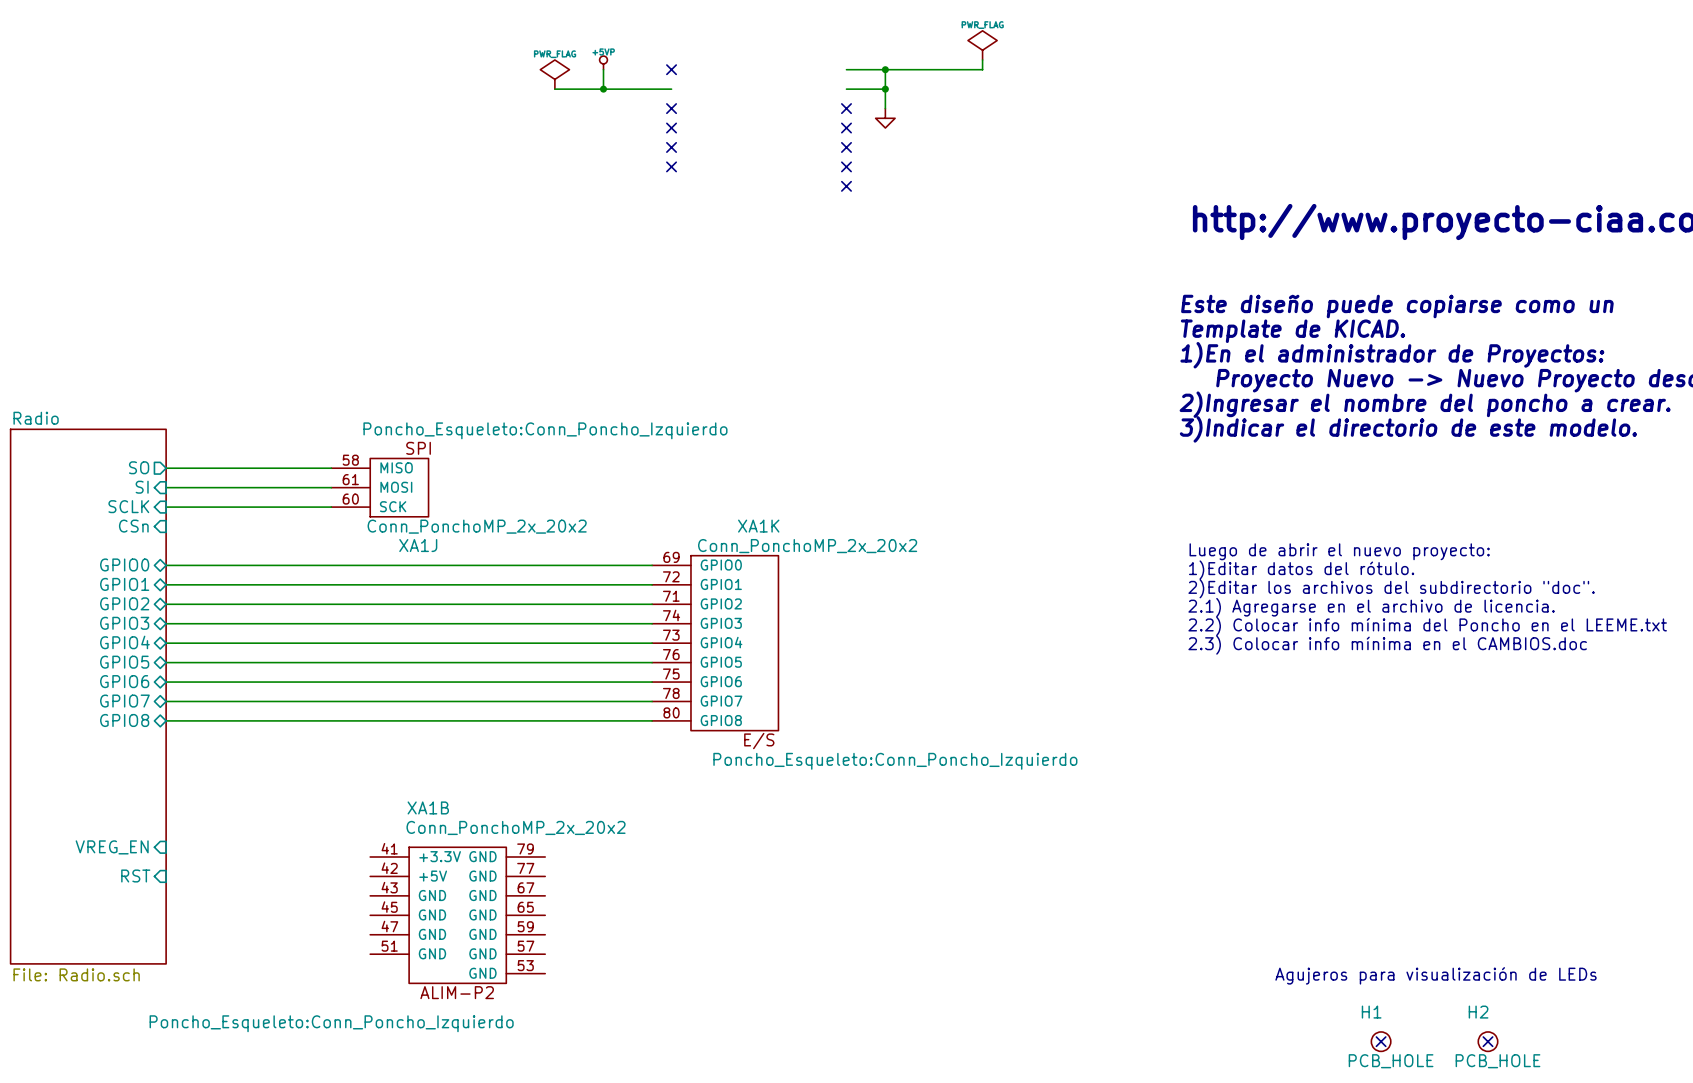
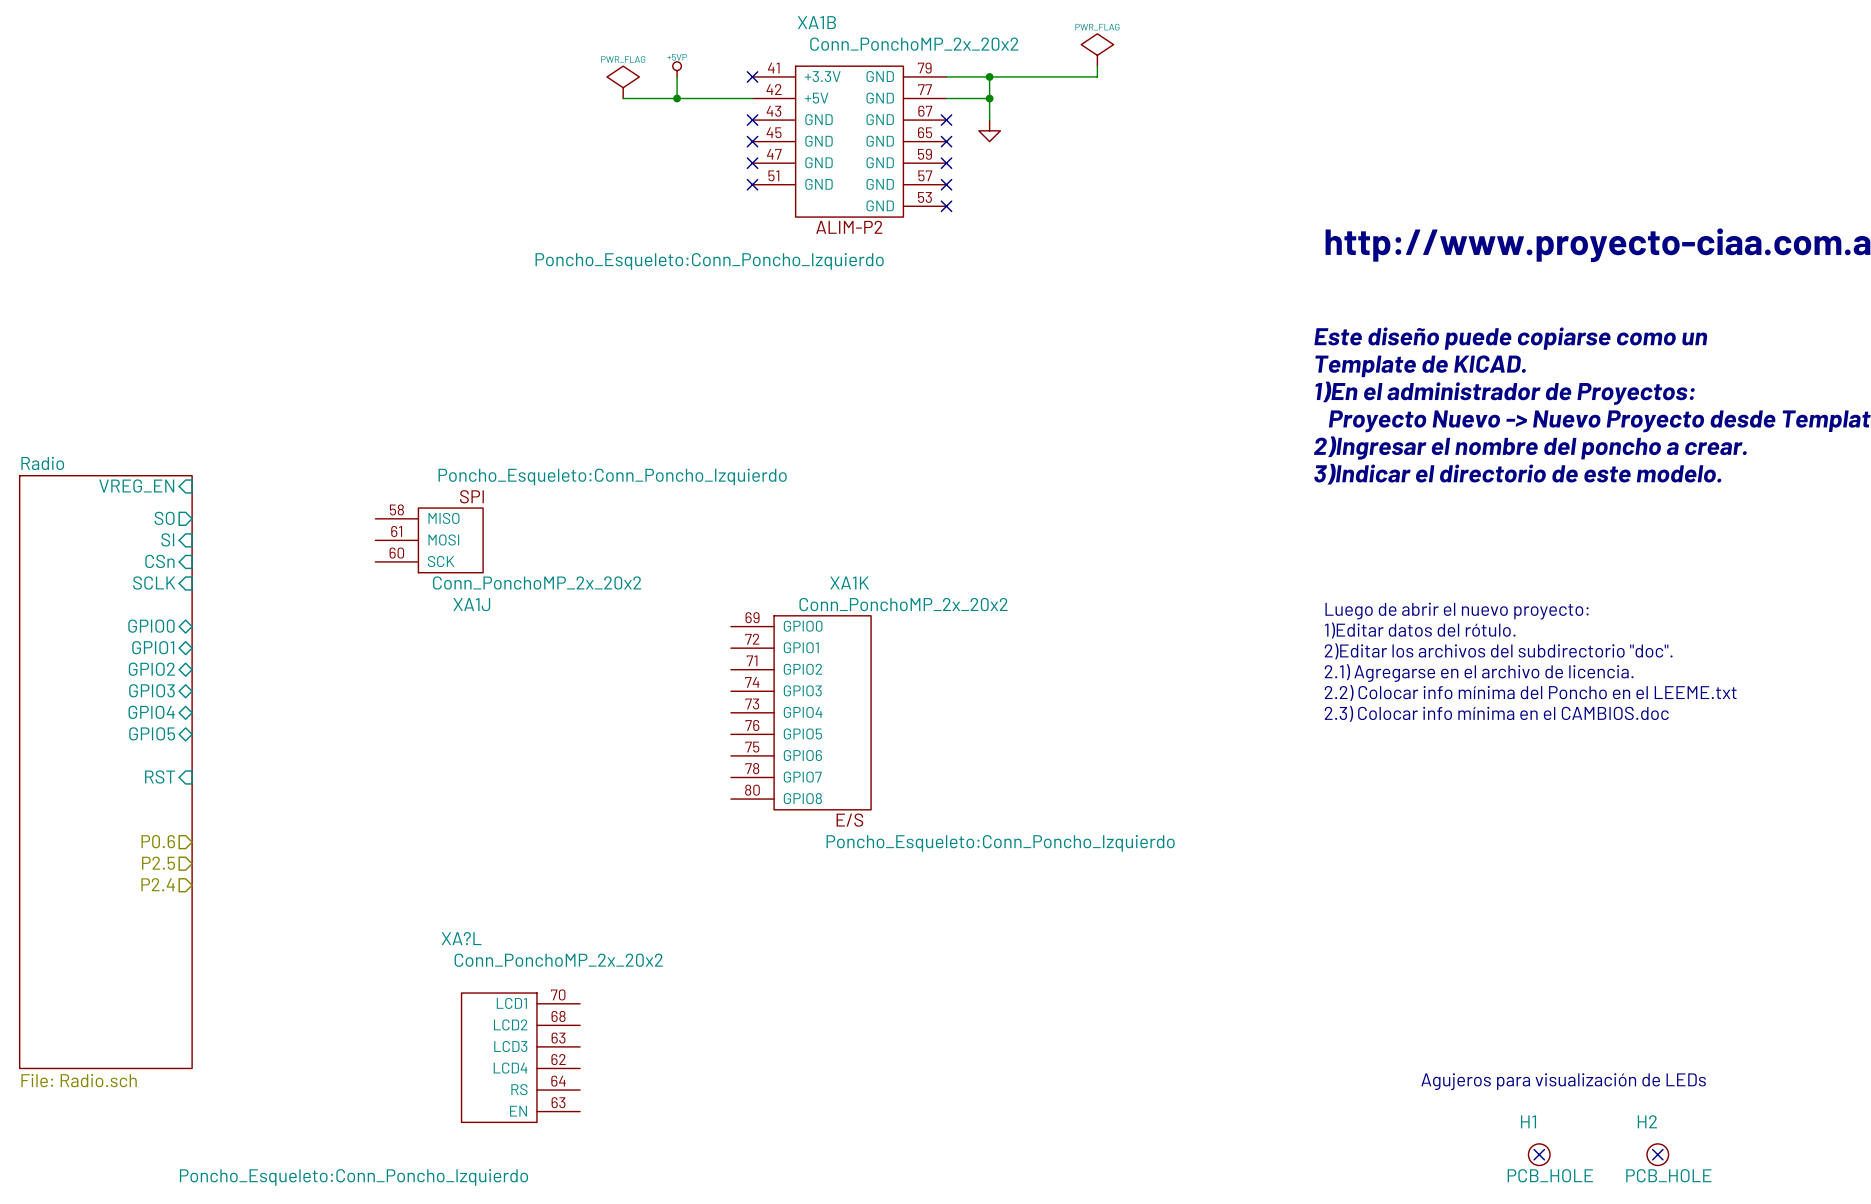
sheet pin: none -> VREG_EN (136, 486)
wire: (166, 468) (331, 468) -> none
wire: (166, 487) (331, 487) -> none
sheet pin: SCLK (128, 506) -> CSn (159, 561)
wire: (166, 507) (331, 507) -> none
sheet pin: CSn (133, 526) -> SCLK (154, 583)
wire: (166, 565) (652, 565) -> none
wire: (166, 584) (652, 584) -> none
wire: (166, 604) (652, 604) -> none
wire: (166, 623) (652, 623) -> none
wire: (166, 643) (652, 643) -> none
wire: (166, 662) (652, 662) -> none
sheet pin: GPIO6 (124, 681) -> none
wire: (166, 682) (652, 682) -> none
sheet pin shape: bidirectional (124, 701) -> input (160, 776)
sheet pin: GPIO7 (124, 701) -> RST (160, 776)
wire: (166, 701) (652, 701) -> none
sheet pin: GPIO8 (124, 720) -> none
wire: (166, 720) (652, 720) -> none
hierarchical label: none -> P0.6 (158, 841)
hierarchical label: none -> P2.5 (158, 863)
hierarchical label: none -> P2.4 (158, 884)
sheet pin: VREG_EN (112, 847) -> none
sheet pin: RST (135, 876) -> none
XA1B position: (457, 915) -> (849, 141)
XA?L: none -> Conn_PonchoMP_2x_20x2 (520, 1057)

